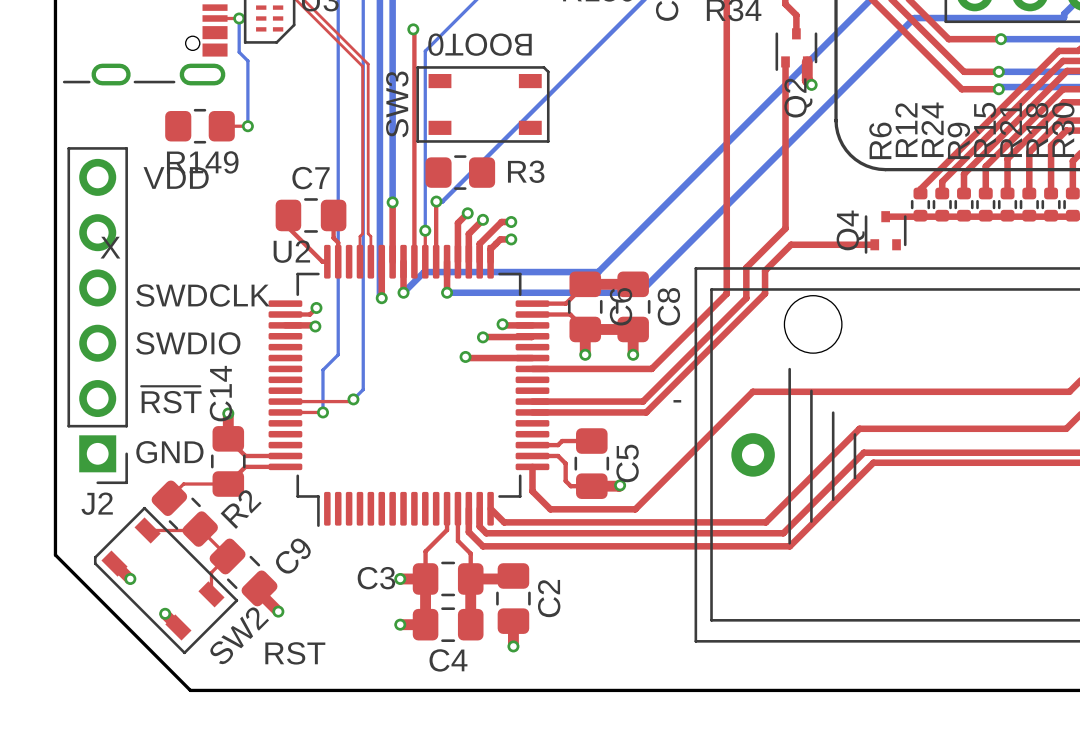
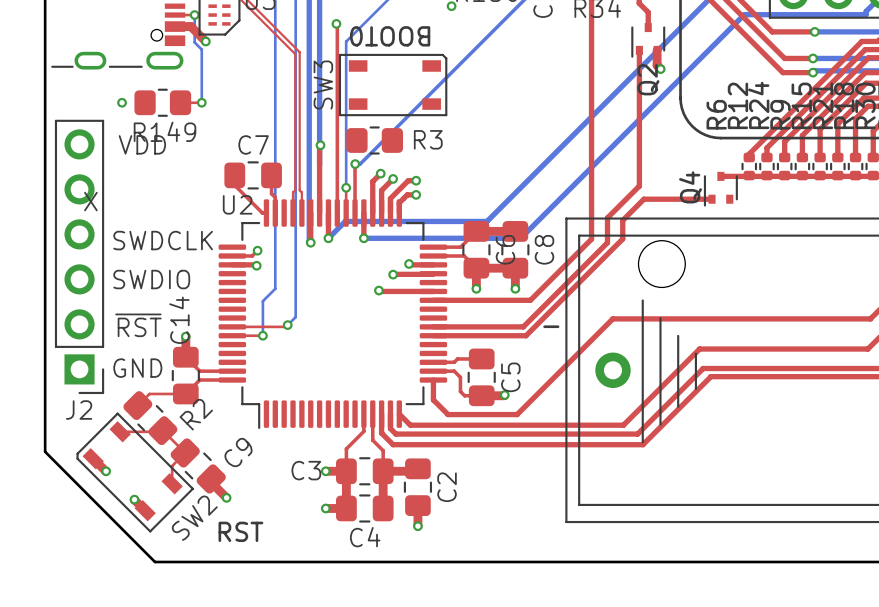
via: none -> (451, 6)
top track: none -> (175, 26) (190, 26) (205, 41)
via: none -> (205, 41)
via: none -> (122, 102)
top track: none -> (320, 145) (319, 164)
via position: (392, 202) -> (320, 145)

